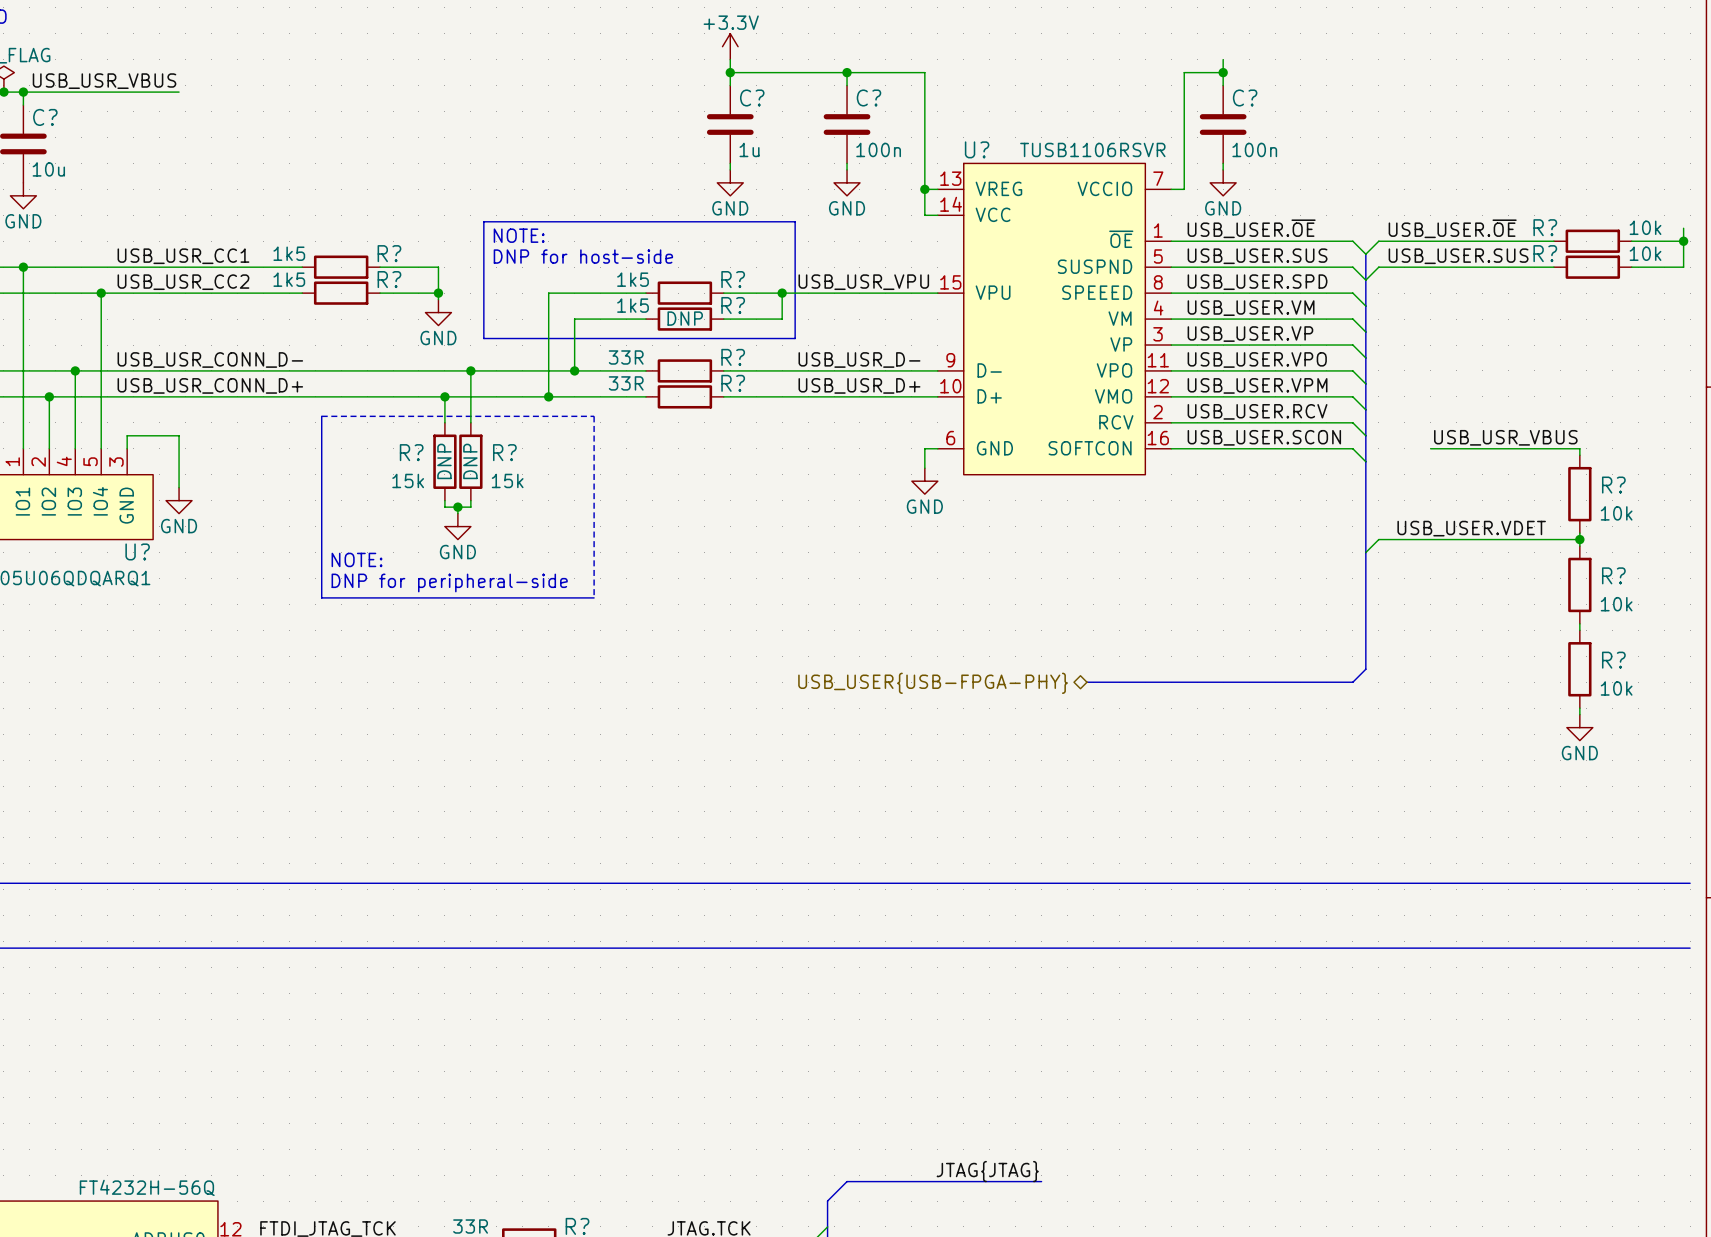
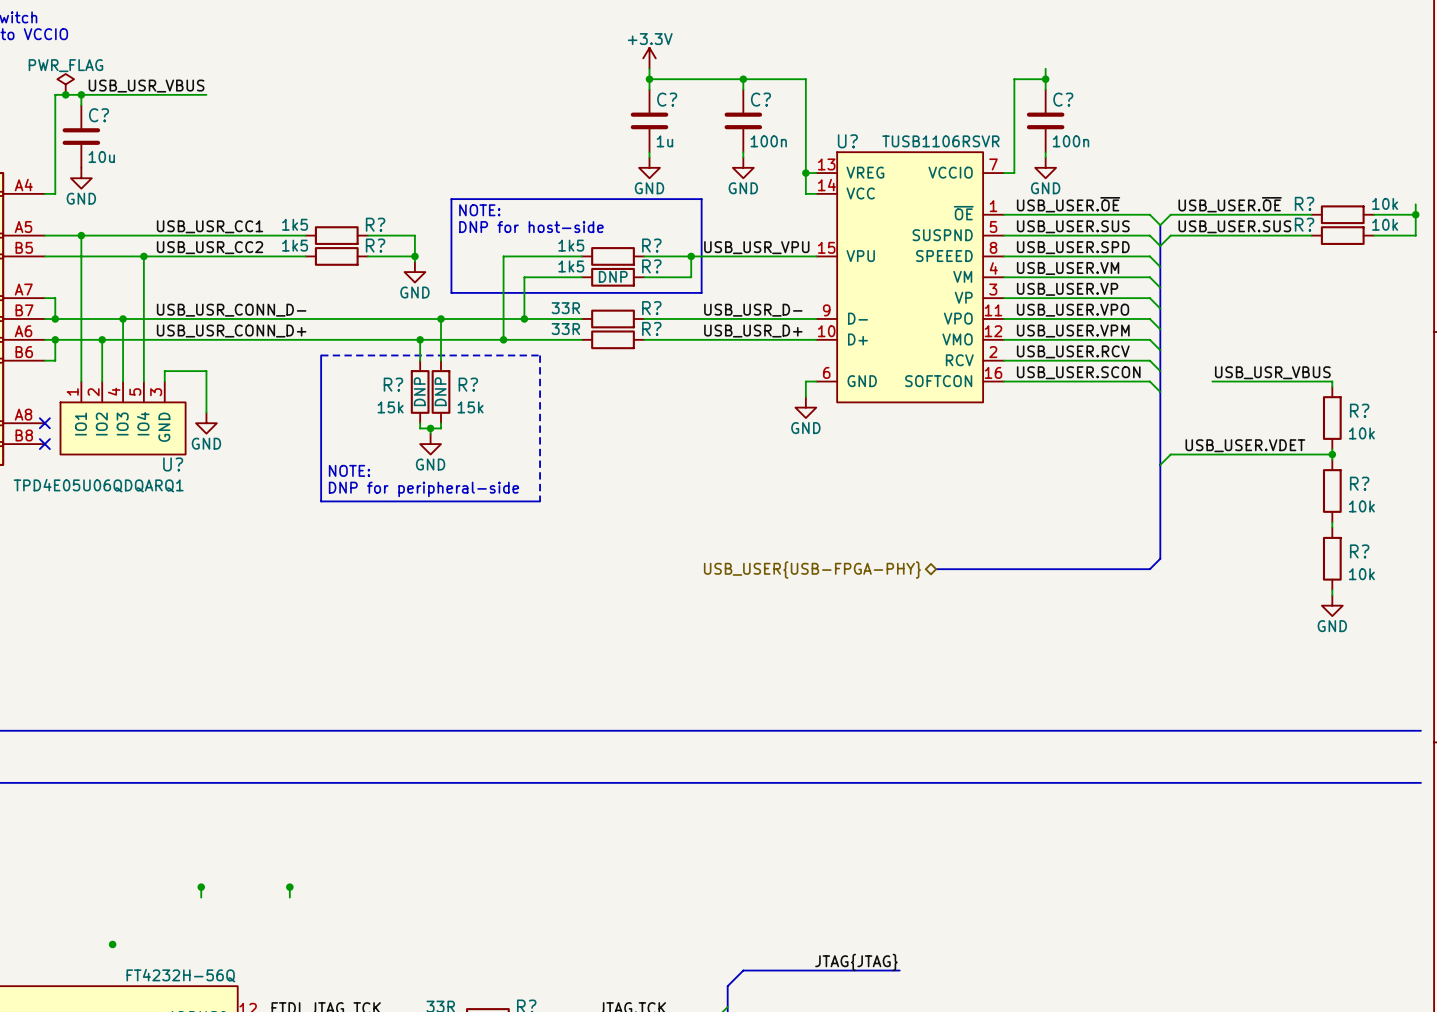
wire: none -> (201, 887) (201, 897)
junction: none -> (201, 887)
wire: none -> (289, 887) (289, 897)
junction: none -> (289, 887)
junction: none -> (112, 944)

